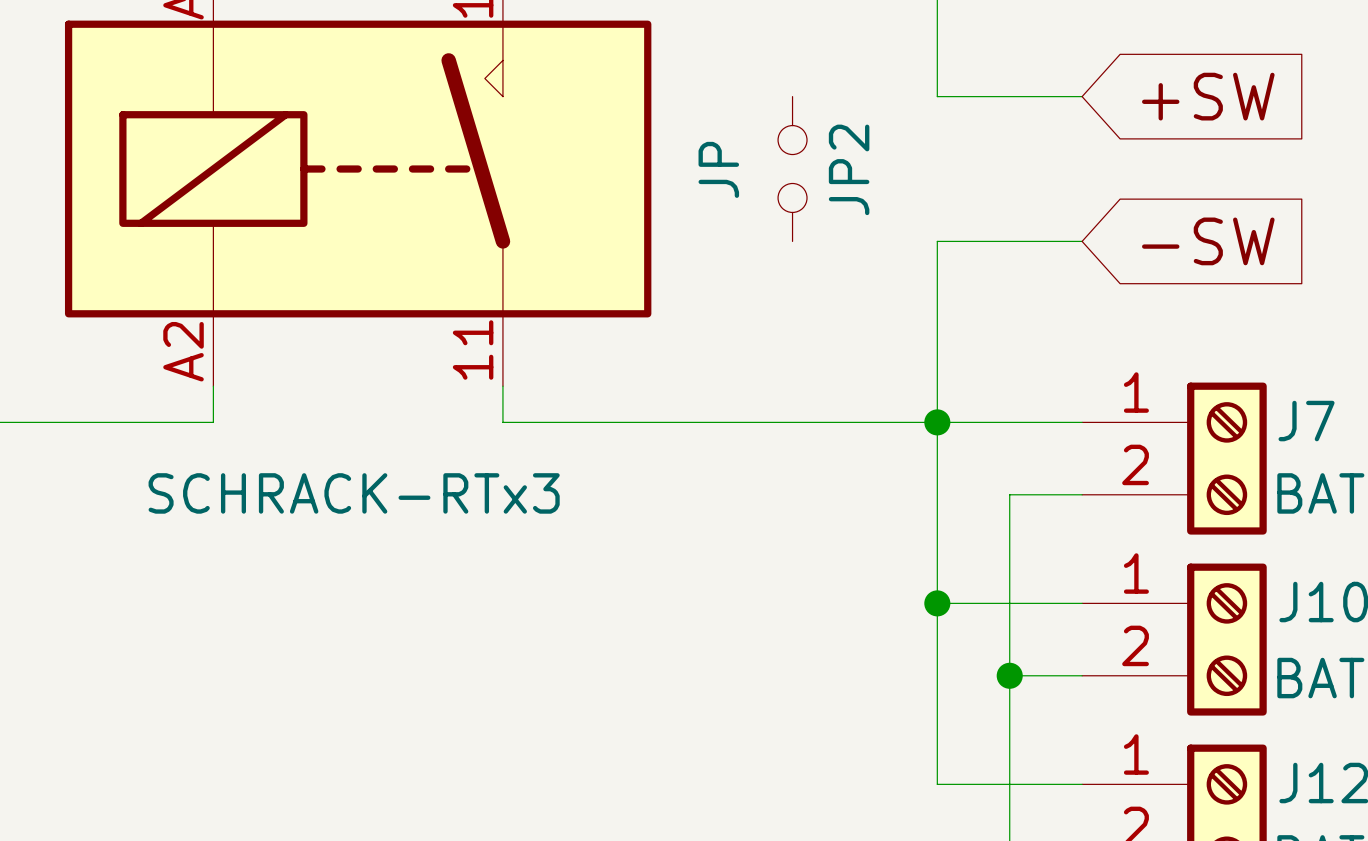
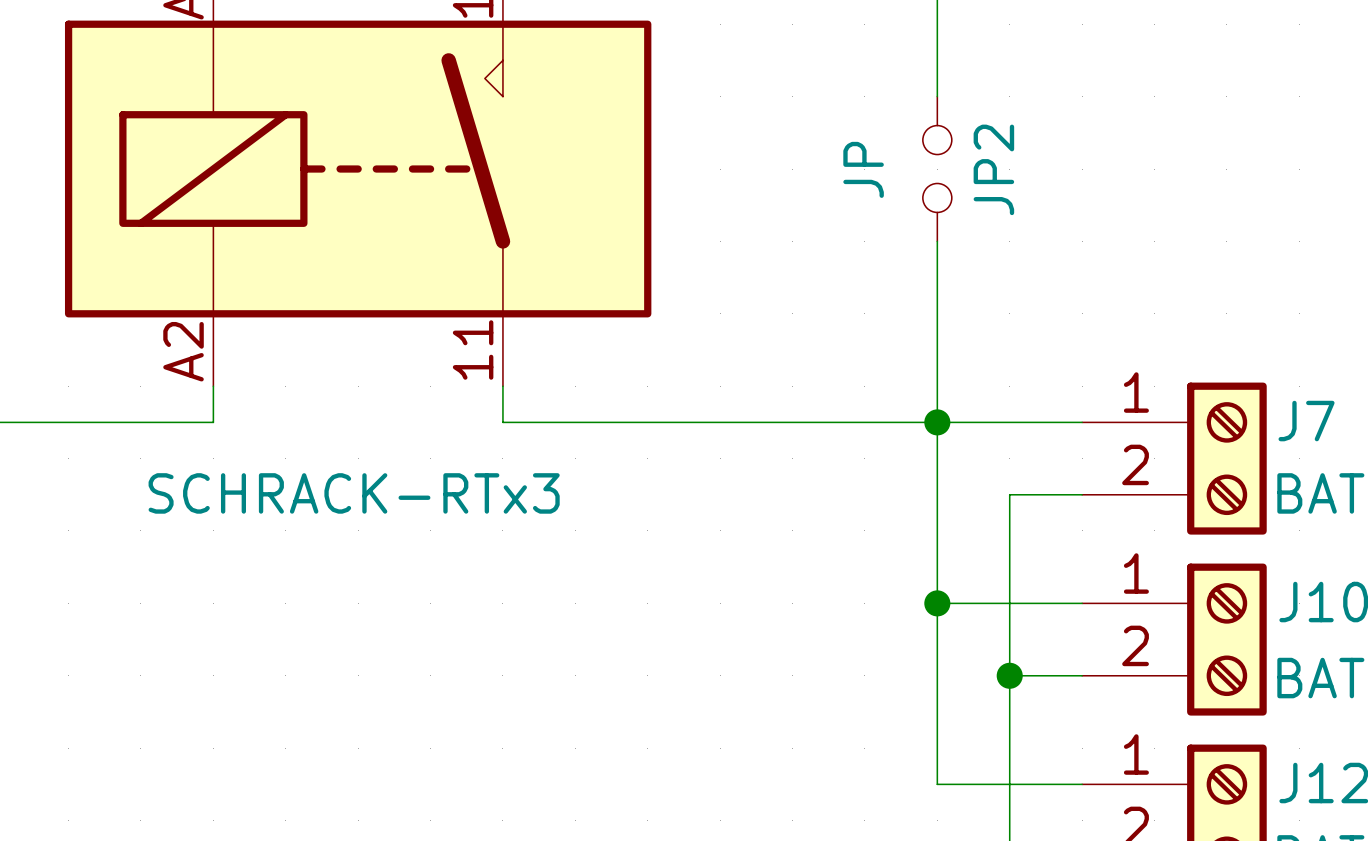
wire: (937, 96) (1082, 96) -> none
global label: +SW (1208, 96) -> none
JP2 position: (792, 169) -> (937, 169)
wire: (937, 241) (1082, 241) -> none
global label: -SW (1208, 241) -> none

